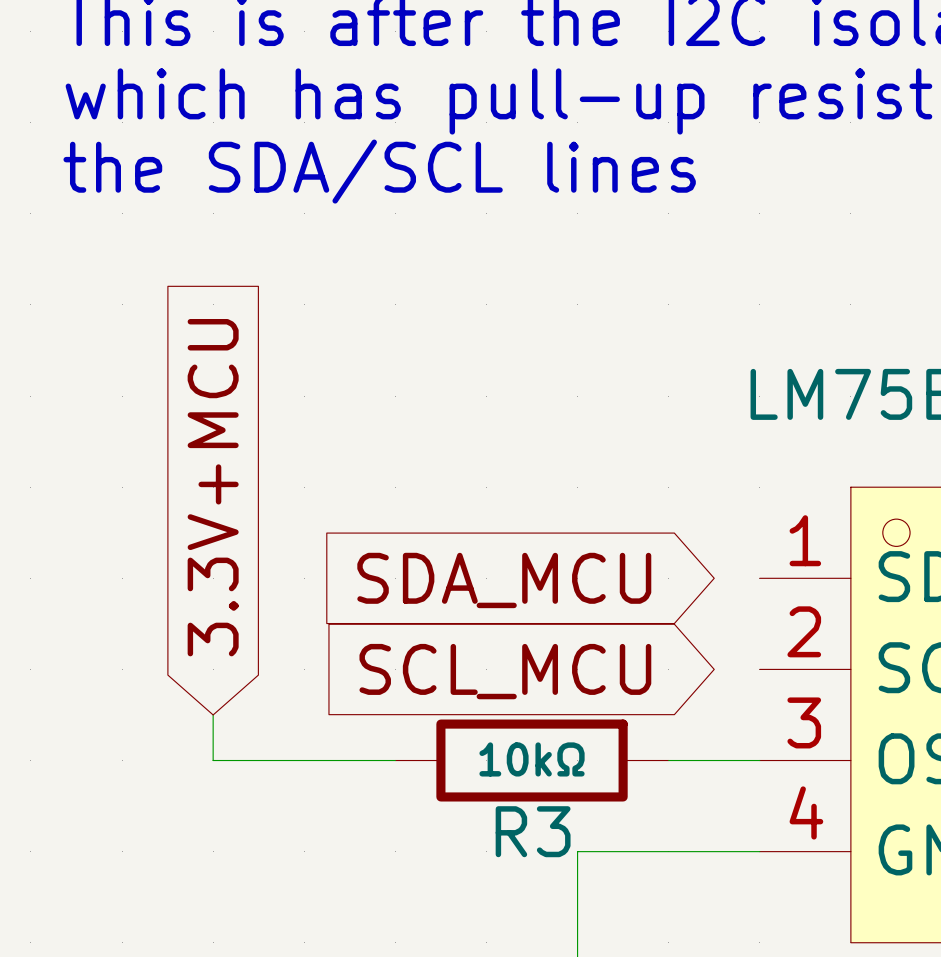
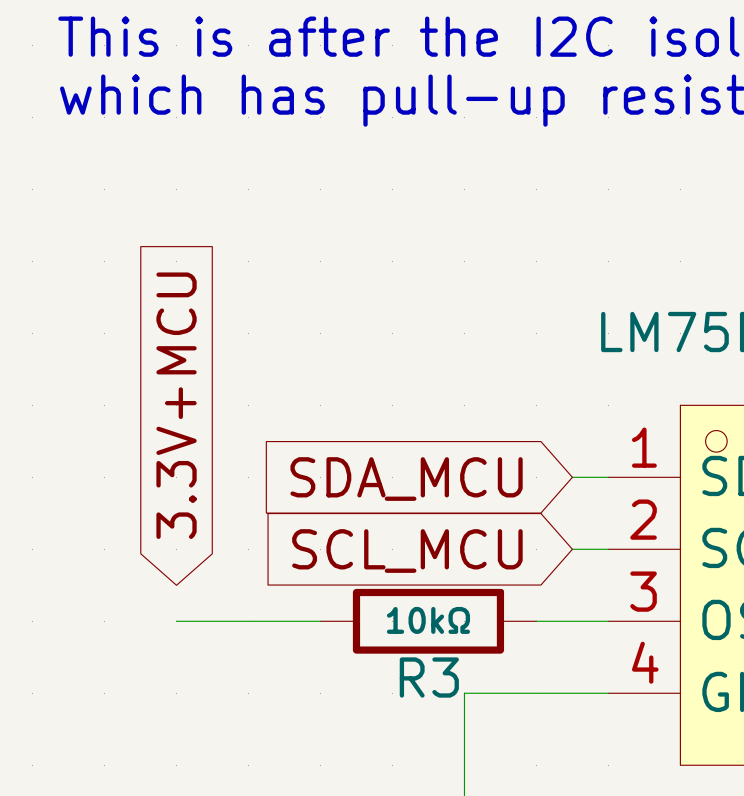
text: the SDA/SCL lines (379, 171) -> none
wire: none -> (572, 477) (608, 477)
wire: none -> (572, 549) (608, 549)
wire: (213, 714) (213, 760) -> none

